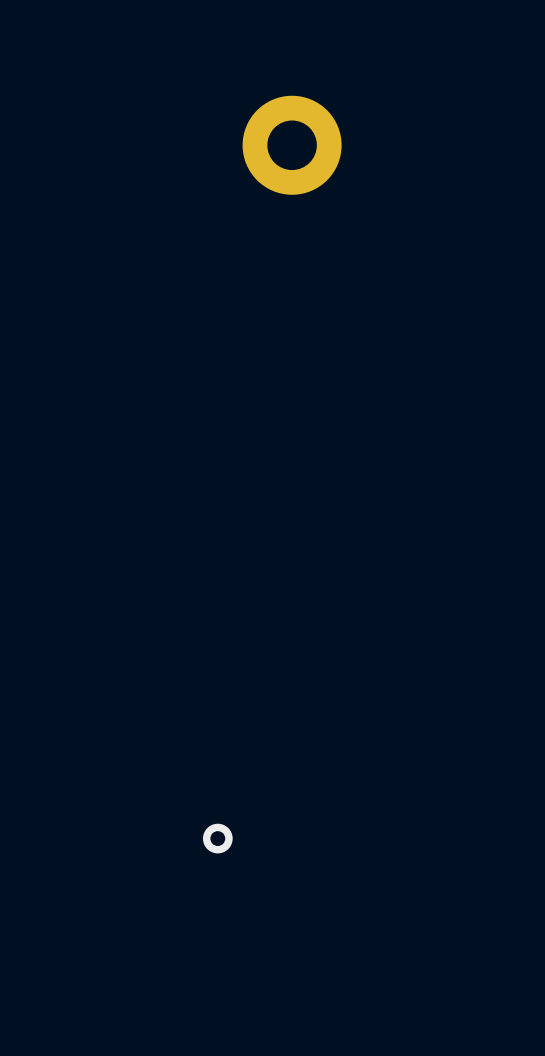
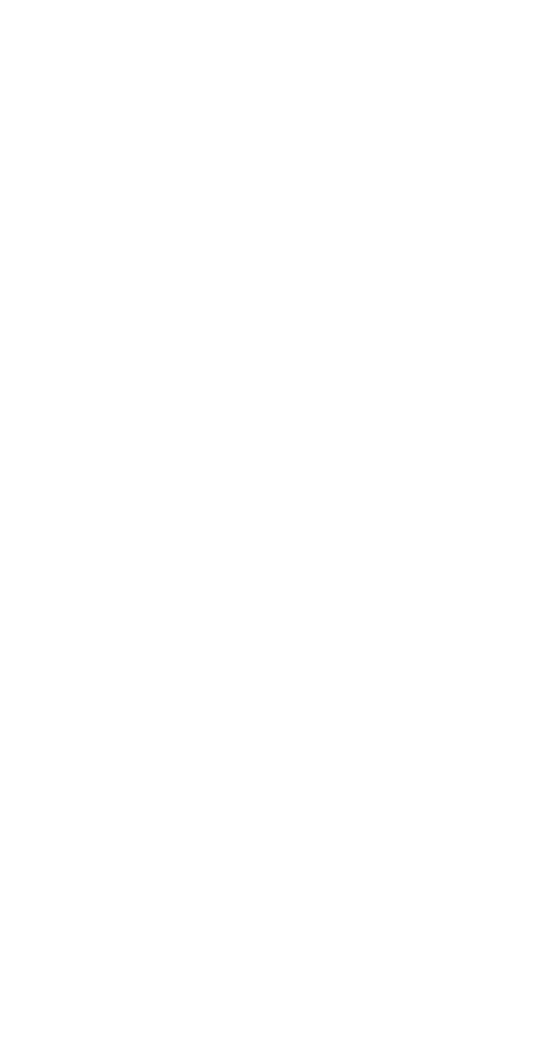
part: (292, 145) -> none
via: (217, 838) -> none

